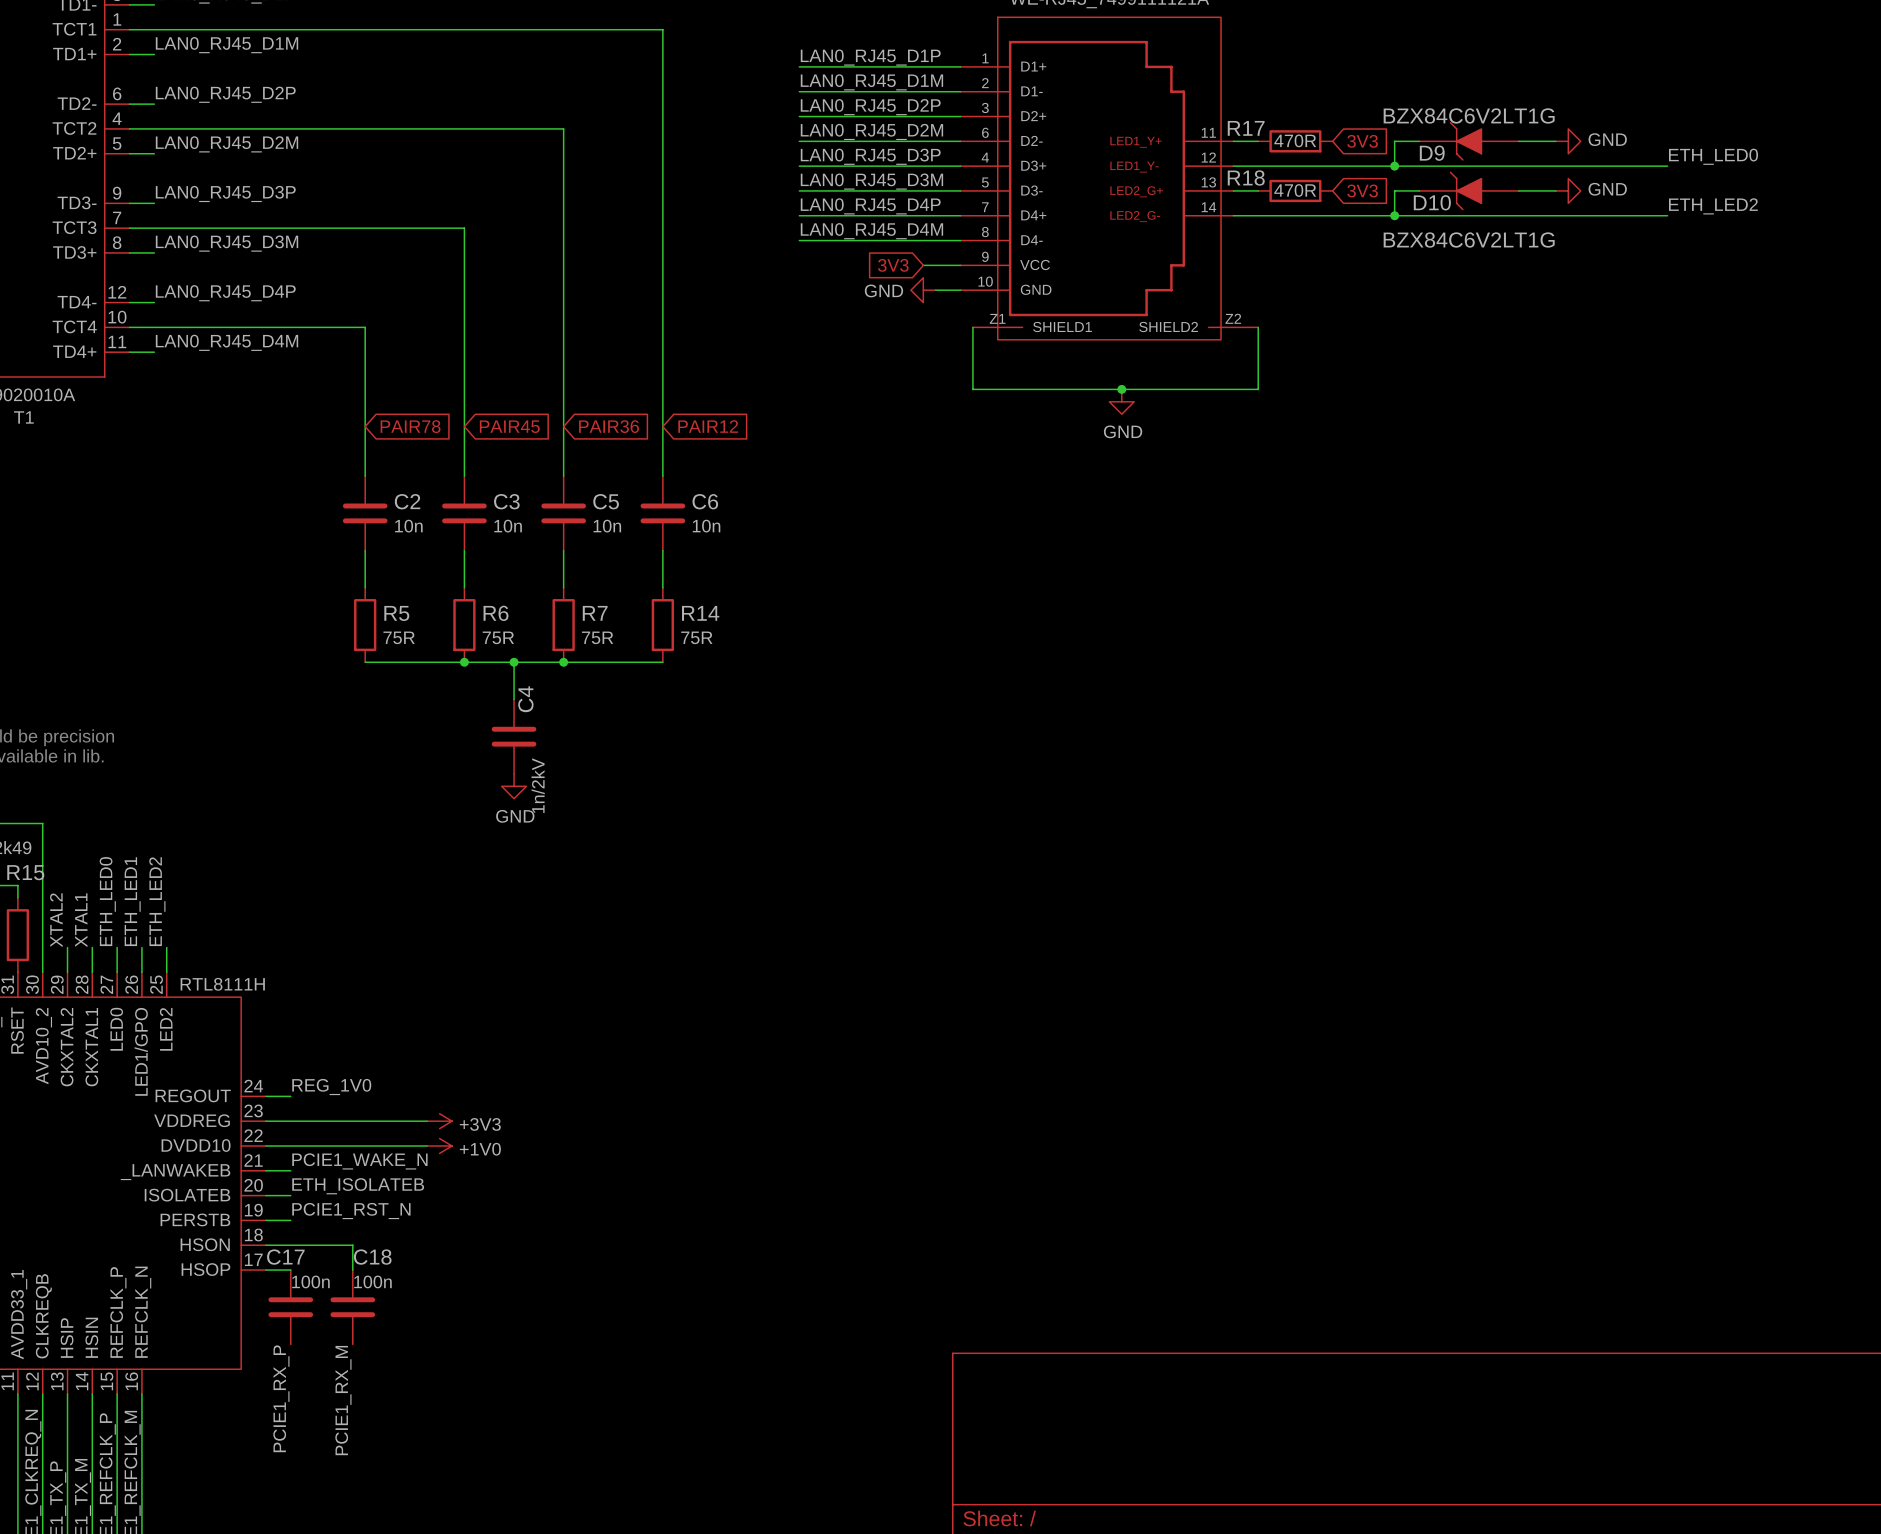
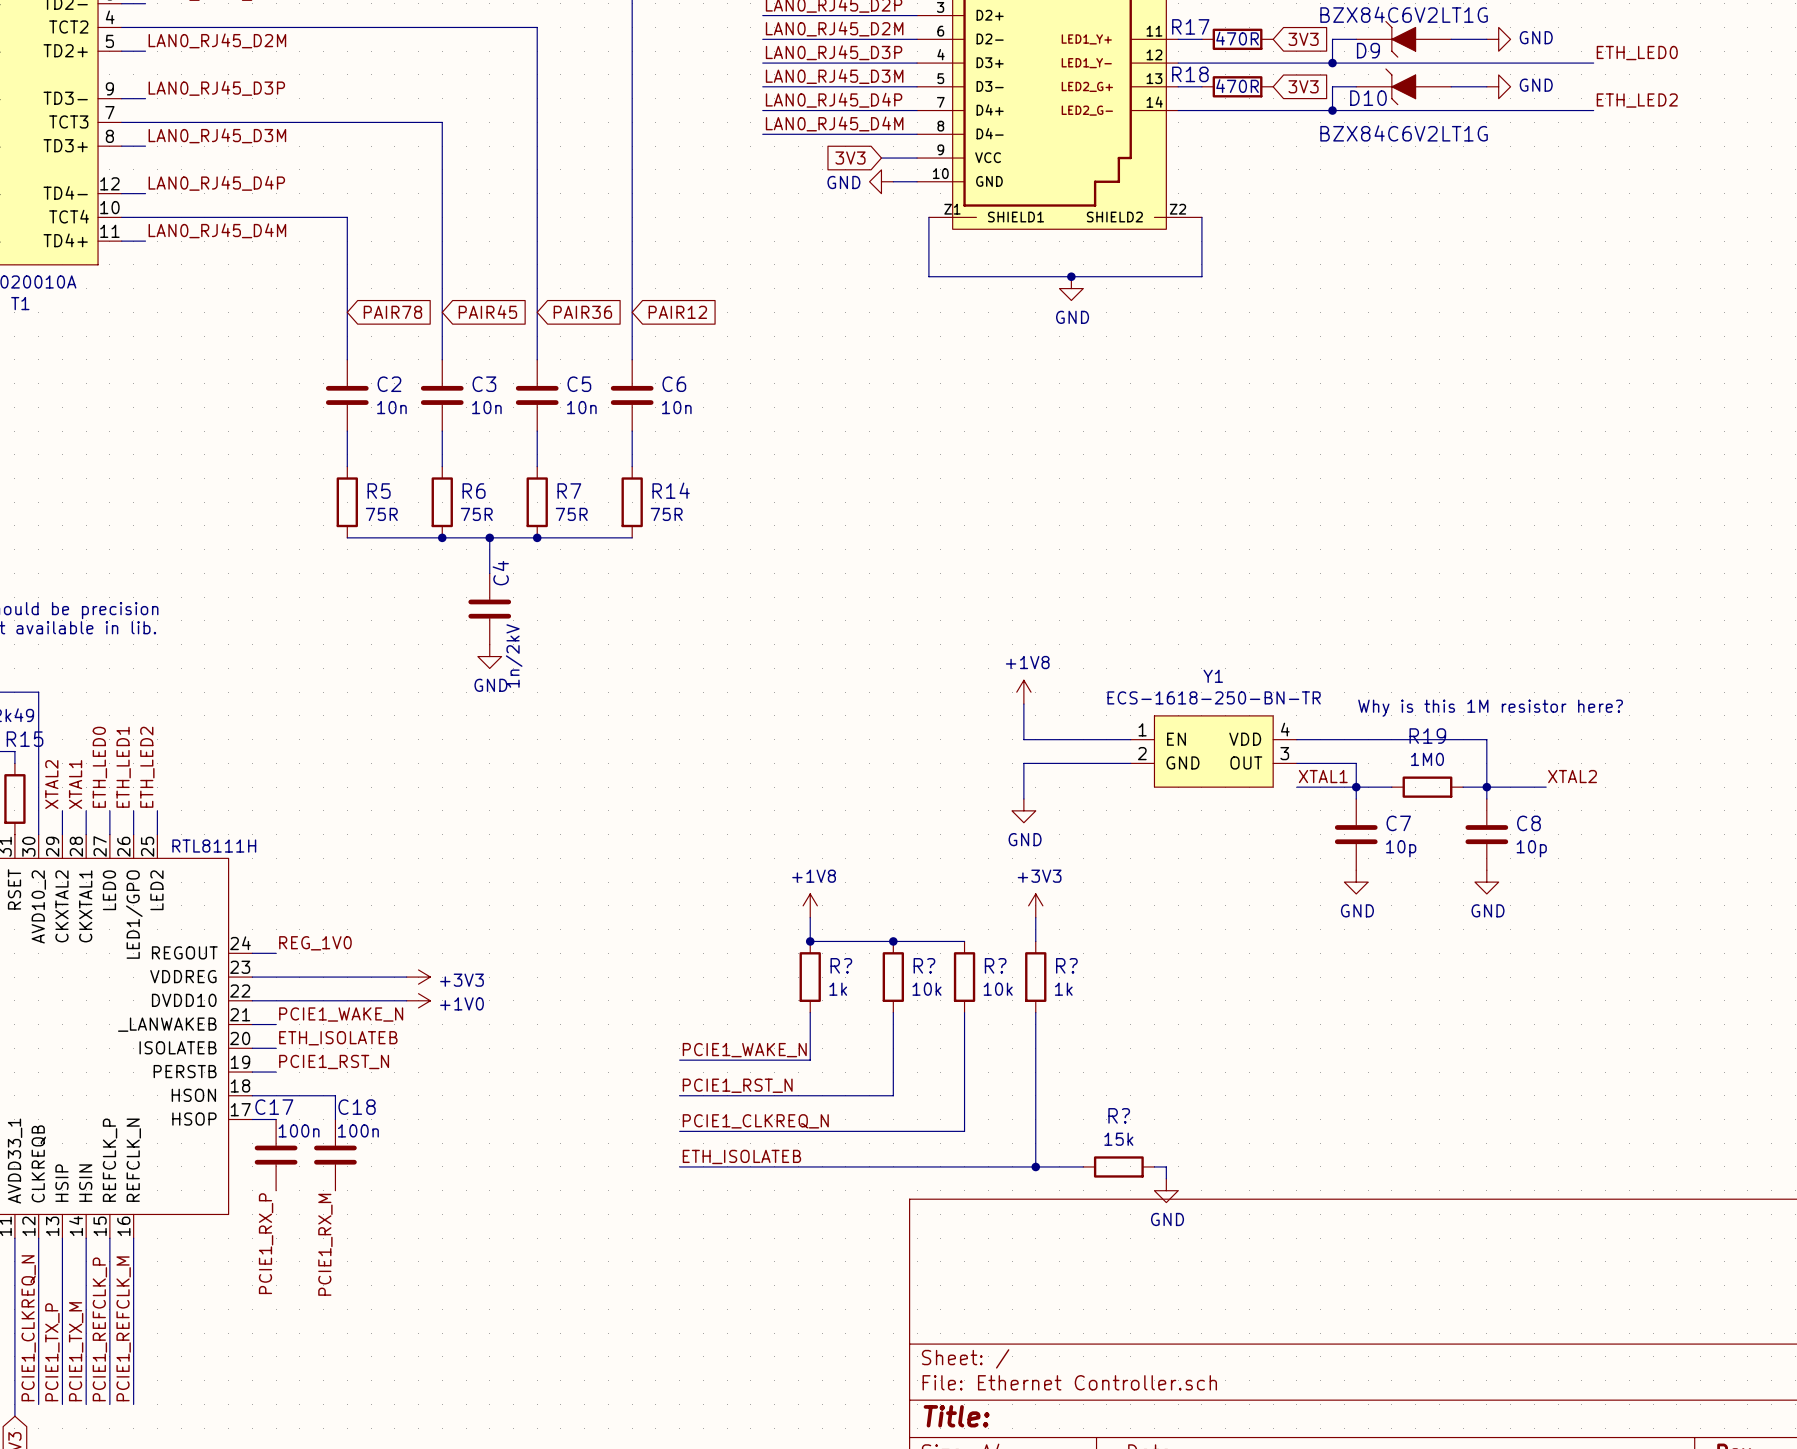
power symbol: none -> +1V8 (1023, 692)
wire: none -> (1023, 704) (1023, 739) (1130, 739)
text: none -> Why is this 1M resistor here? (1490, 708)
wire: none -> (1296, 739) (1486, 739) (1486, 799)
Y1: none -> ECS-1618-250-BN-TR (1213, 751)
wire: none -> (1130, 763) (1023, 763) (1023, 799)
wire: none -> (1296, 763) (1356, 763) (1356, 799)
label: none -> XTAL1 (1323, 776)
label: none -> XTAL2 (1572, 776)
wire: none -> (1296, 787) (1391, 787)
junction: none -> (1356, 787)
R19: none -> (1427, 787)
wire: none -> (1463, 787) (1546, 787)
junction: none -> (1486, 787)
power symbol: none -> GND (1023, 810)
C7: none -> (1356, 834)
C8: none -> (1486, 834)
power symbol: none -> GND (1356, 882)
power symbol: none -> GND (1486, 882)
power symbol: none -> +1V8 (810, 905)
power symbol: none -> +3V3 (1035, 905)
wire: none -> (810, 917) (810, 941) (964, 941)
wire: none -> (1035, 917) (1035, 941)
junction: none -> (810, 941)
junction: none -> (893, 941)
R?: none -> (810, 977)
R?: none -> (893, 977)
R?: none -> (964, 977)
R?: none -> (1035, 977)
wire: none -> (810, 1012) (810, 1060) (679, 1060)
wire: none -> (893, 1012) (893, 1095) (679, 1095)
wire: none -> (964, 1012) (964, 1131) (679, 1131)
wire: none -> (1035, 1012) (1035, 1166)
label: none -> PCIE1_WAKE_N (744, 1050)
label: none -> PCIE1_RST_N (737, 1085)
label: none -> PCIE1_CLKREQ_N (755, 1121)
label: none -> ETH_ISOLATEB (741, 1156)
wire: none -> (679, 1166) (1083, 1166)
junction: none -> (1035, 1166)
R?: none -> (1118, 1166)
wire: none -> (1154, 1166) (1166, 1166) (1166, 1178)
power symbol: none -> GND (1166, 1190)

